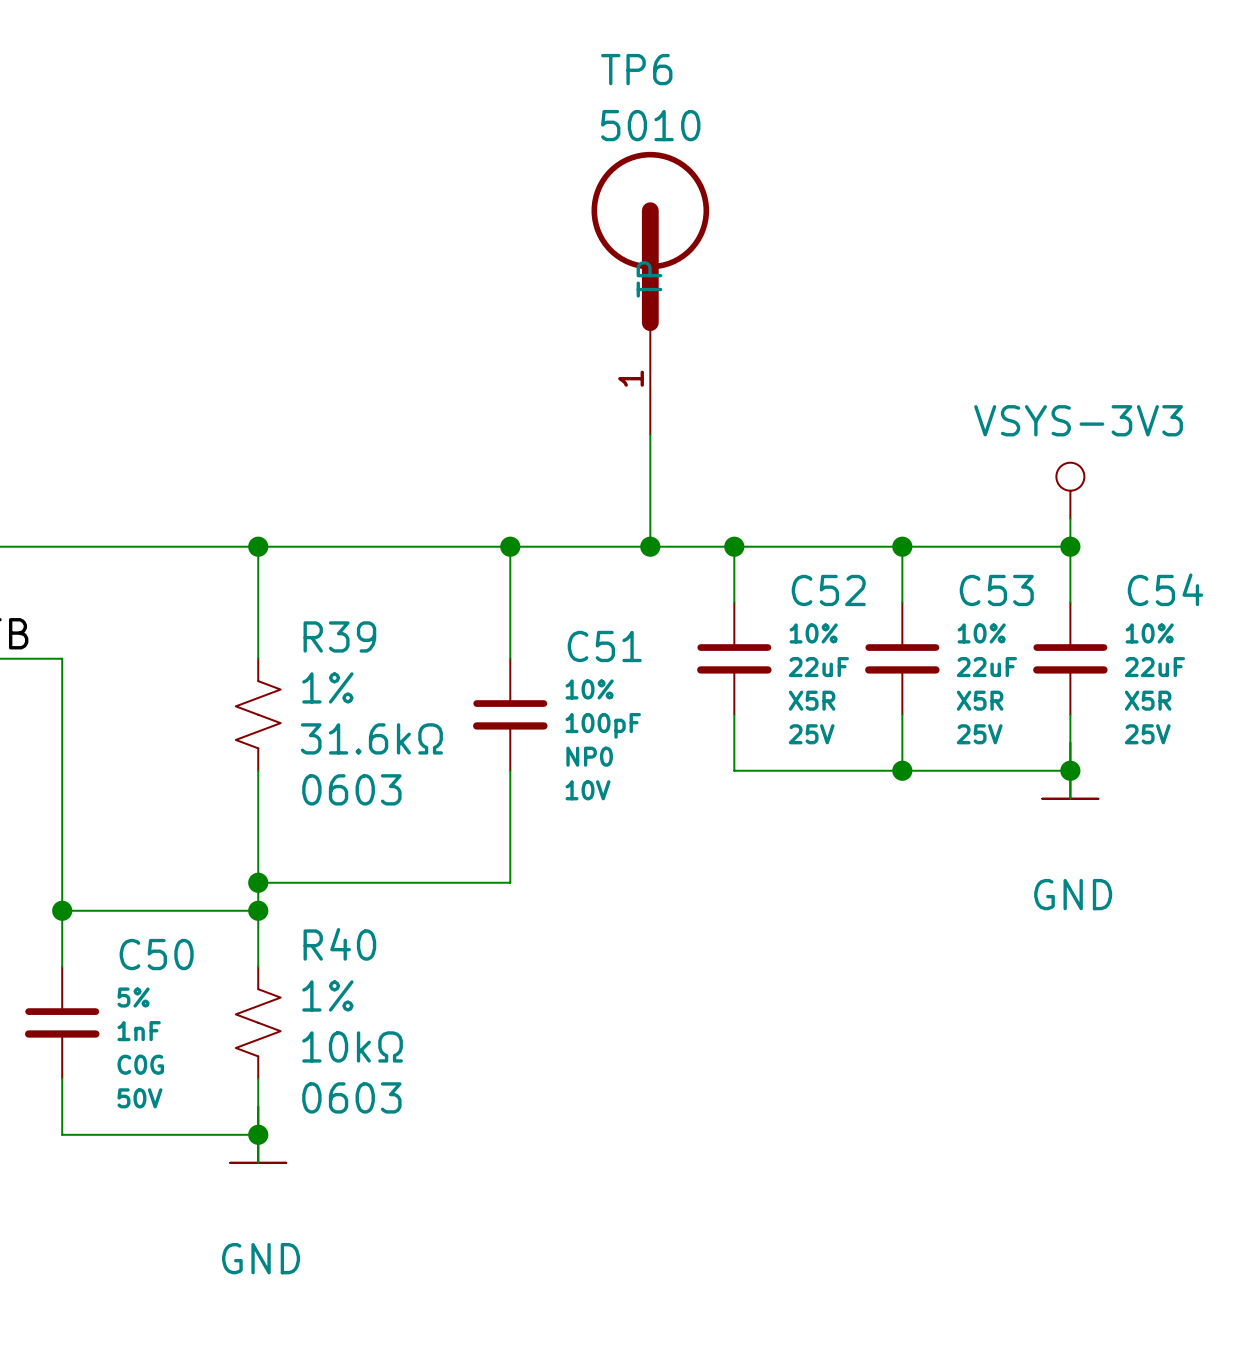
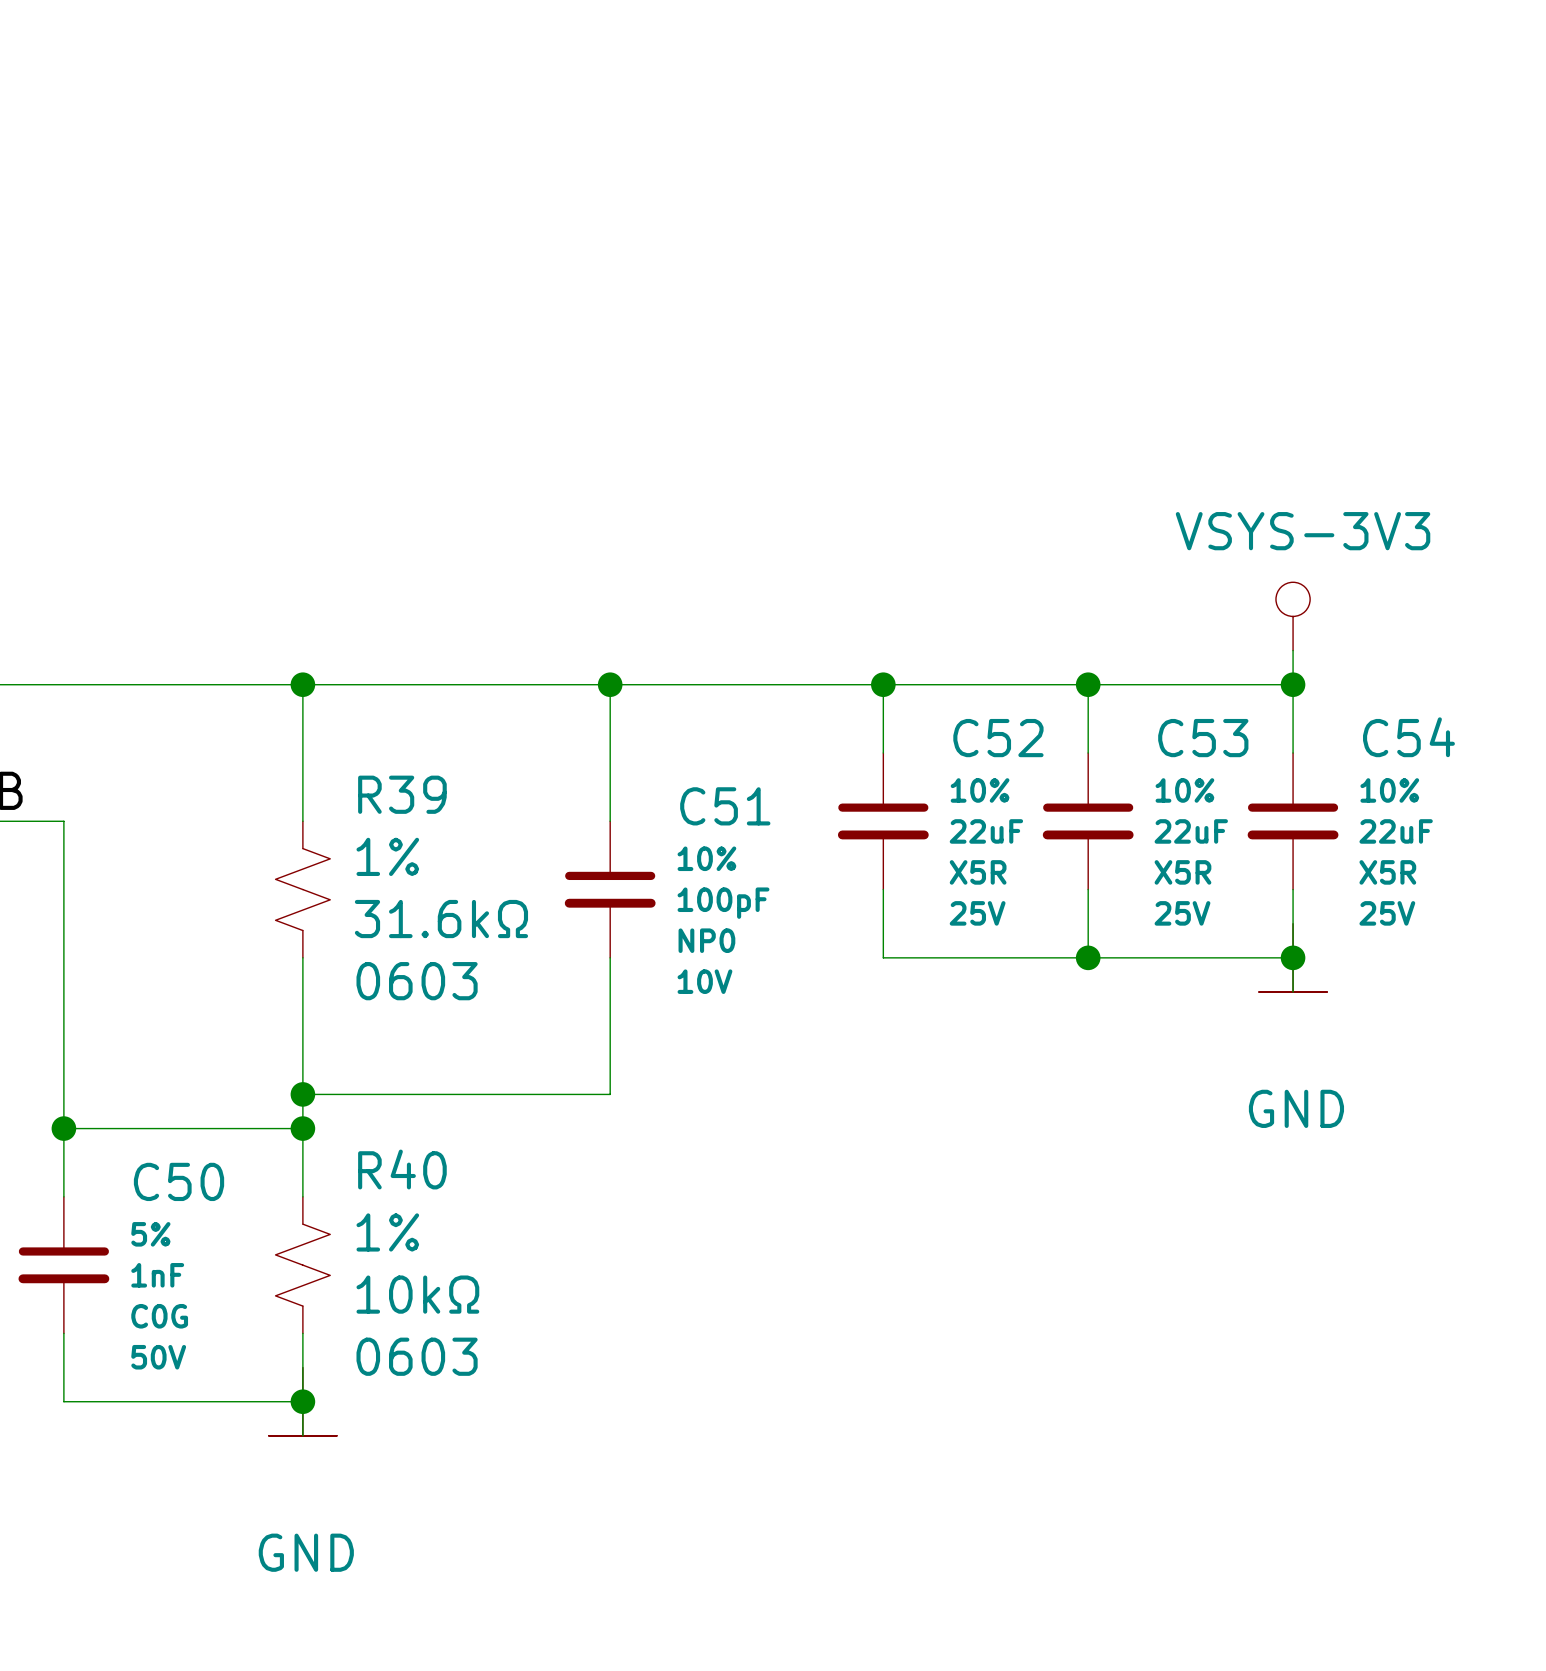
TP6: (650, 293) -> none
wire: (650, 434) (650, 546) -> none
junction: (650, 546) -> none

